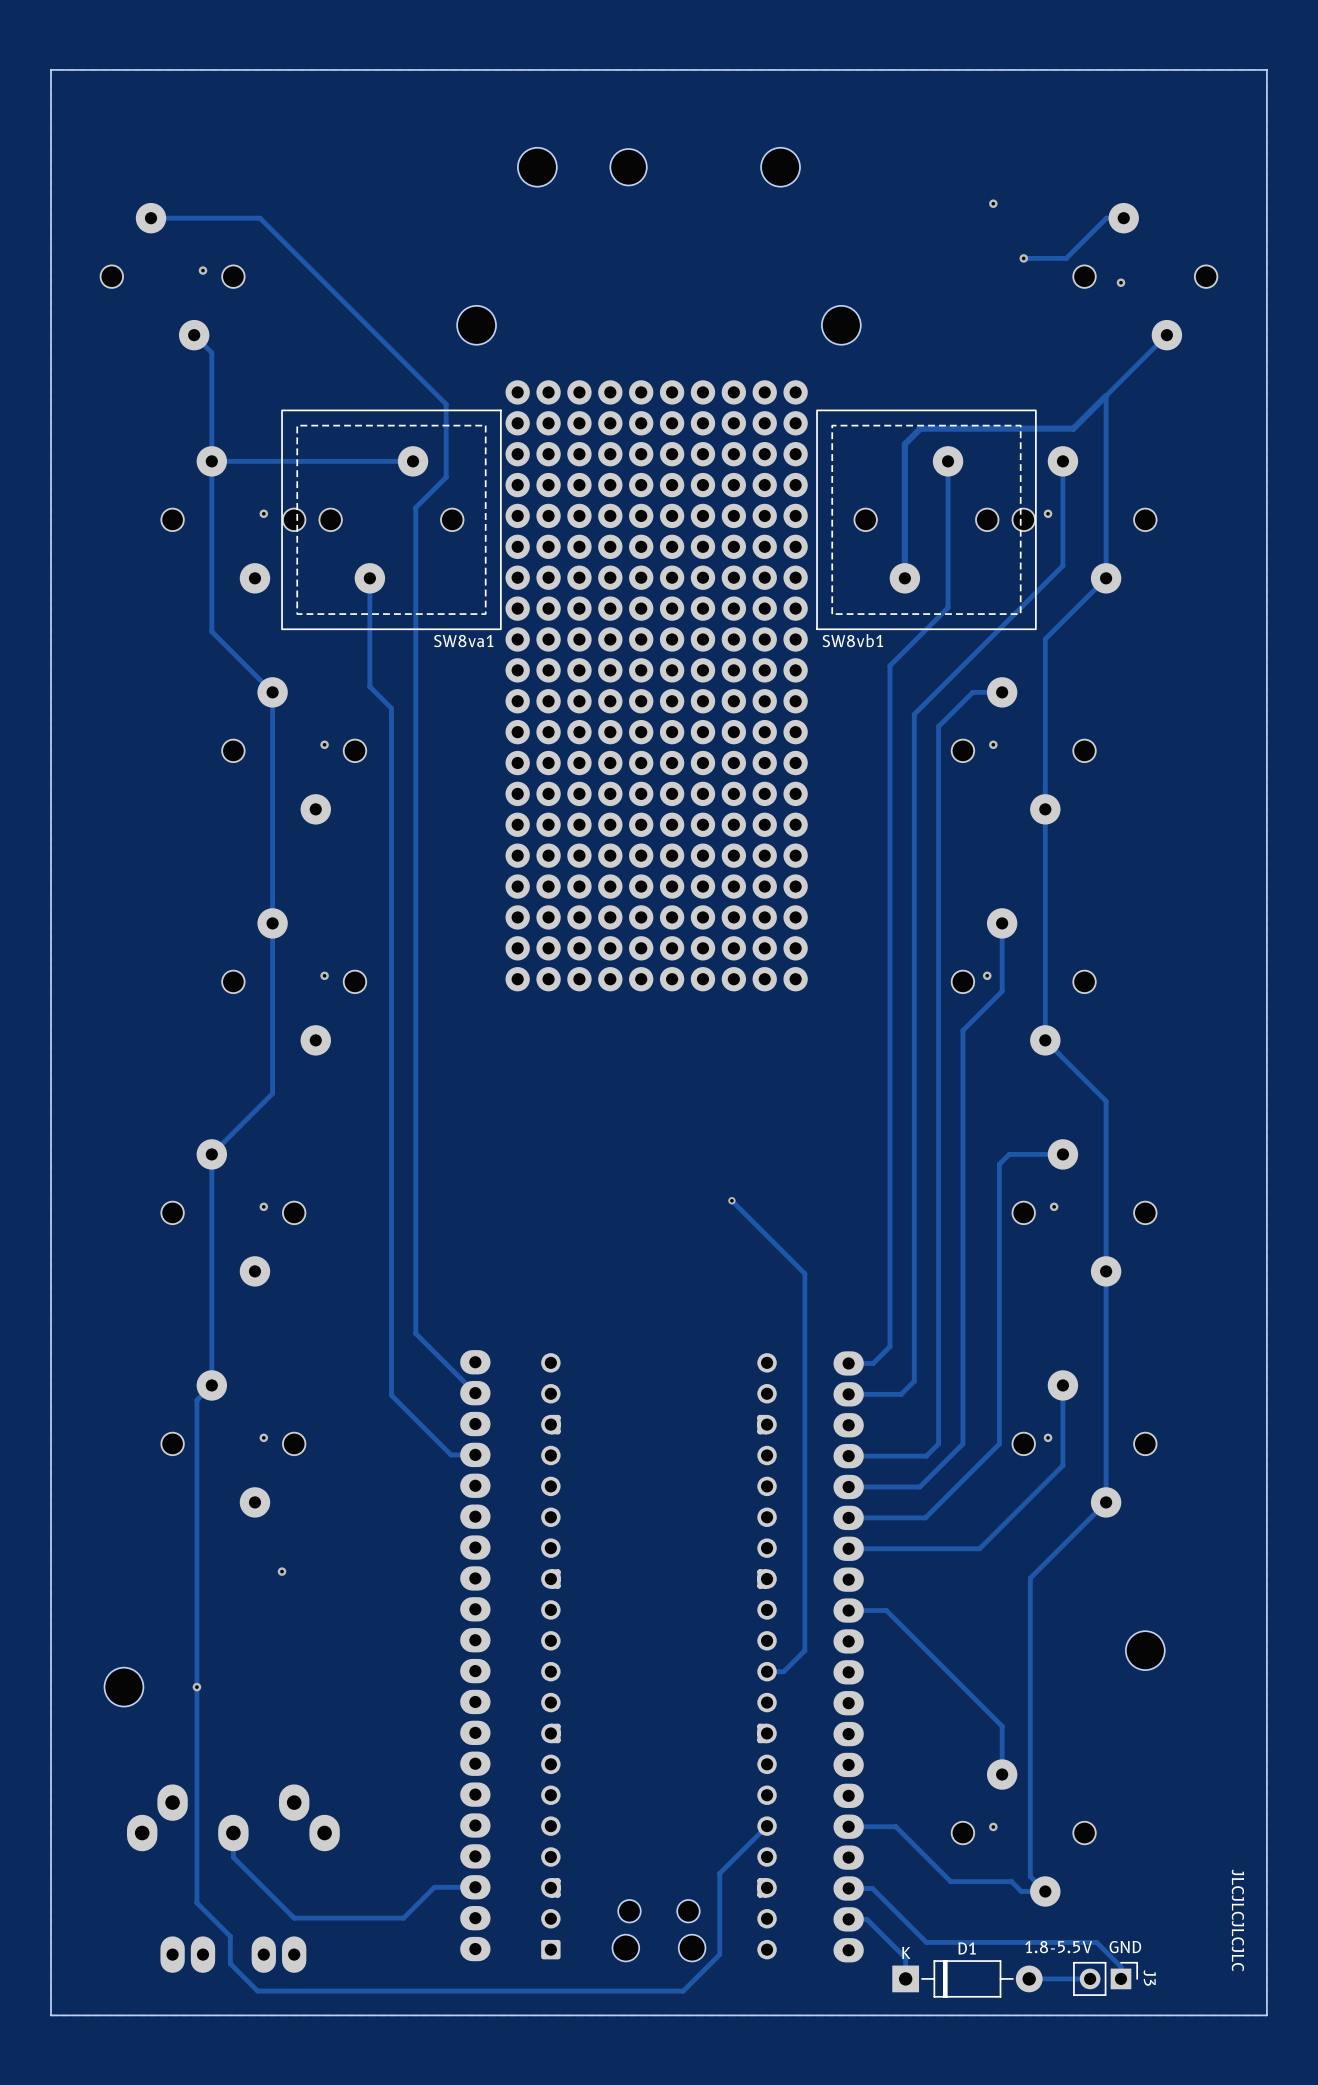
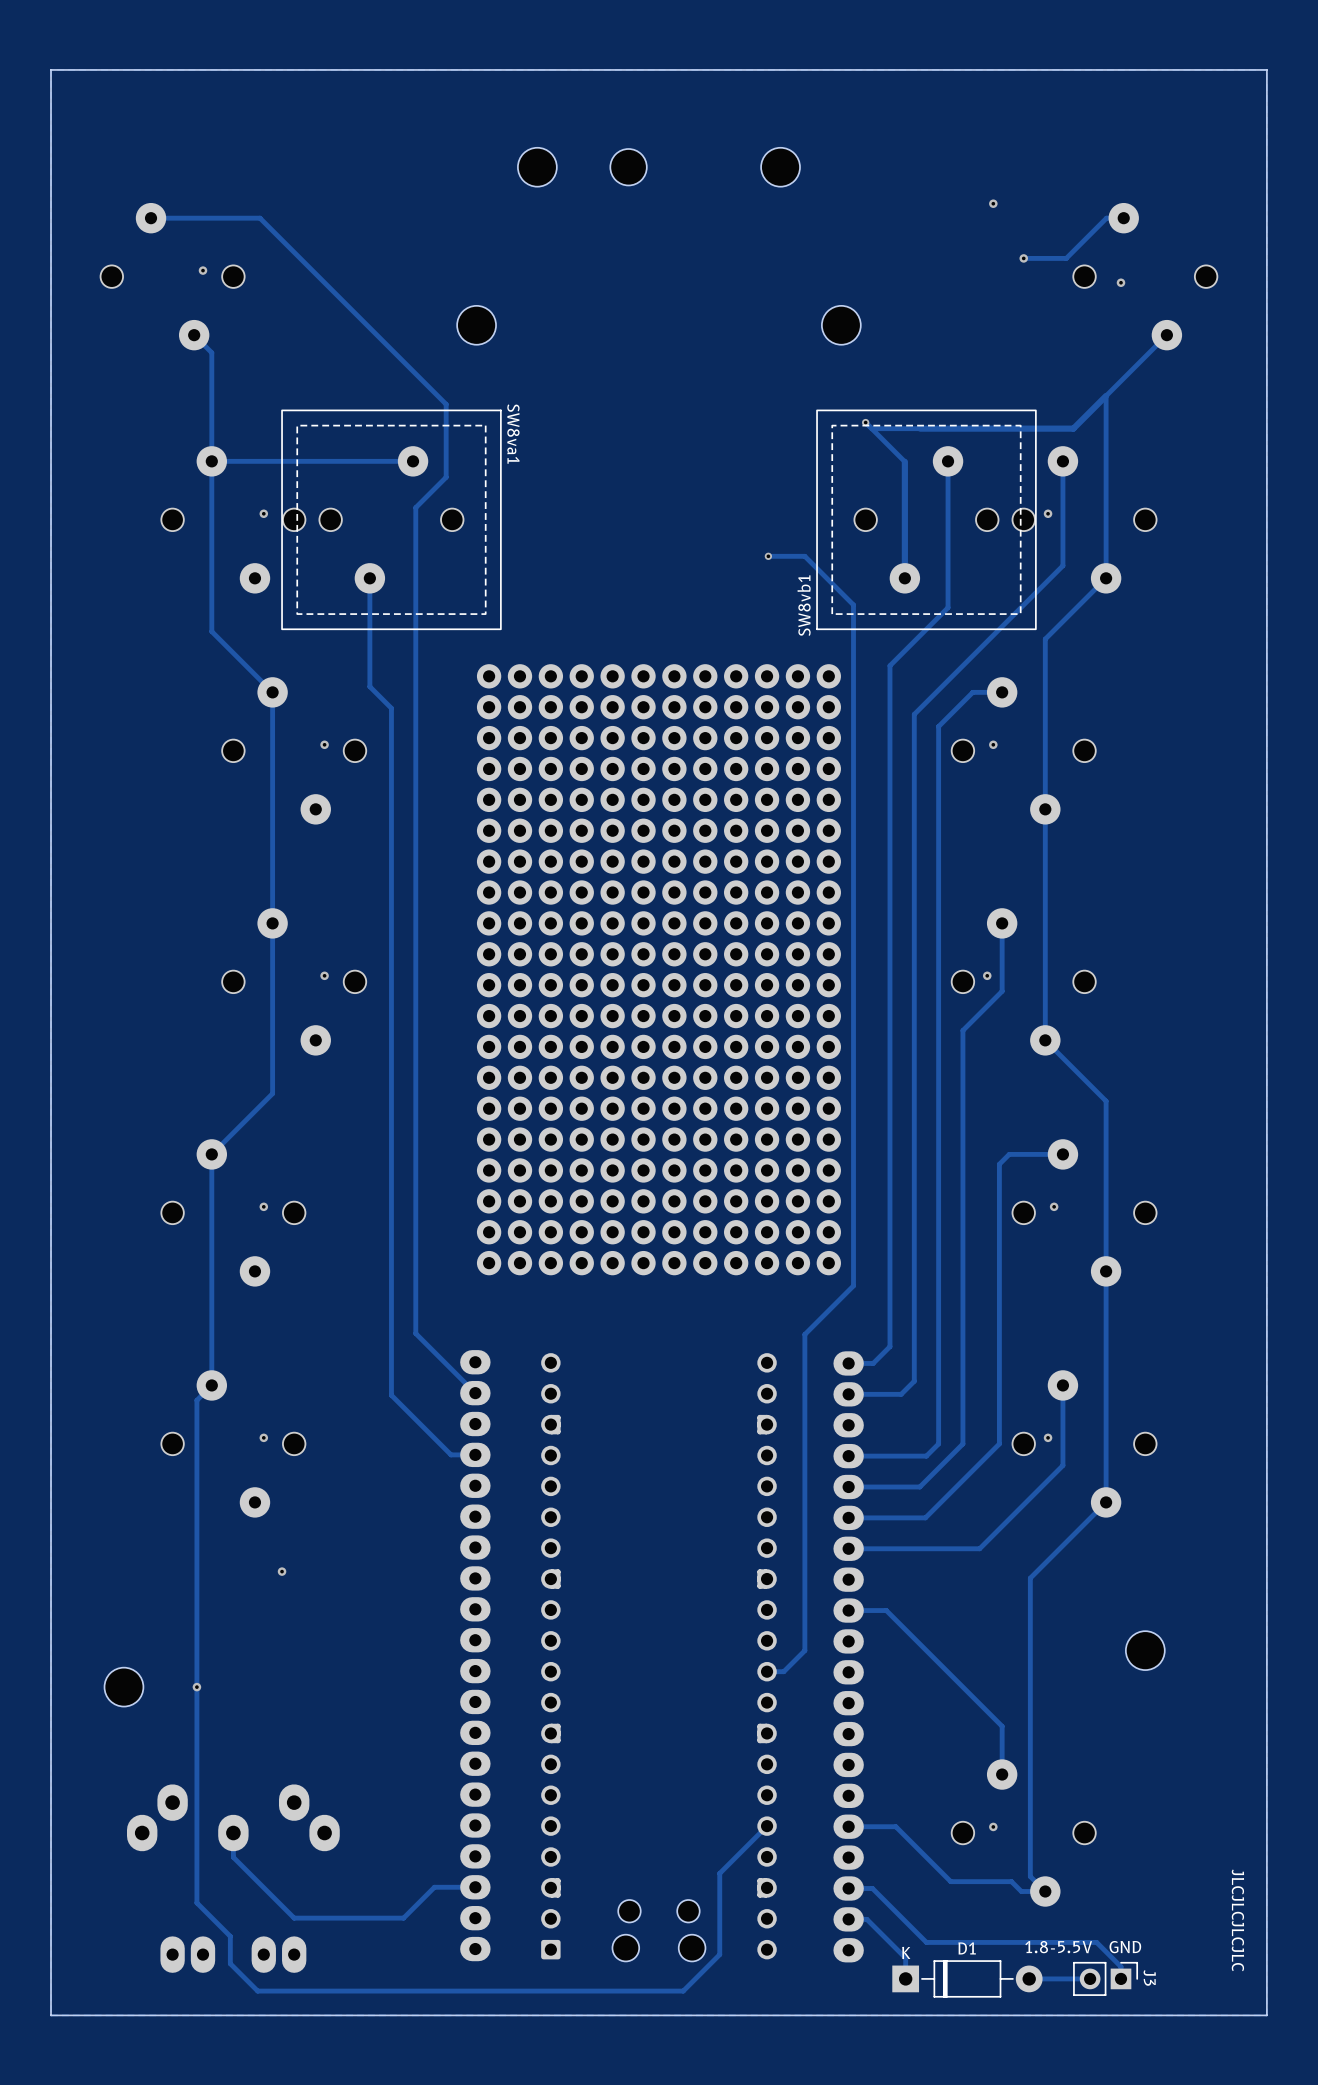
track: none -> (865, 422) (904, 461)
via: none -> (865, 422)
track: (920, 428) (904, 444) (904, 461) -> (920, 428) (871, 428)
via: none -> (768, 556)
SW8vb1 name rotation: 0° (852, 640) -> 90° counterclockwise (804, 605)
SW8va1 name rotation: 0° (463, 641) -> 90° clockwise (513, 434)
SW8va1 name position: SW8va1 (463, 641) -> SW8va1 (513, 434)
part: (656, 685) -> none
part: none -> (658, 969)
track: (731, 1200) (804, 1273) (804, 1334) -> (768, 556) (804, 556) (853, 604) (853, 1285) (804, 1334)
via: (731, 1200) -> none

